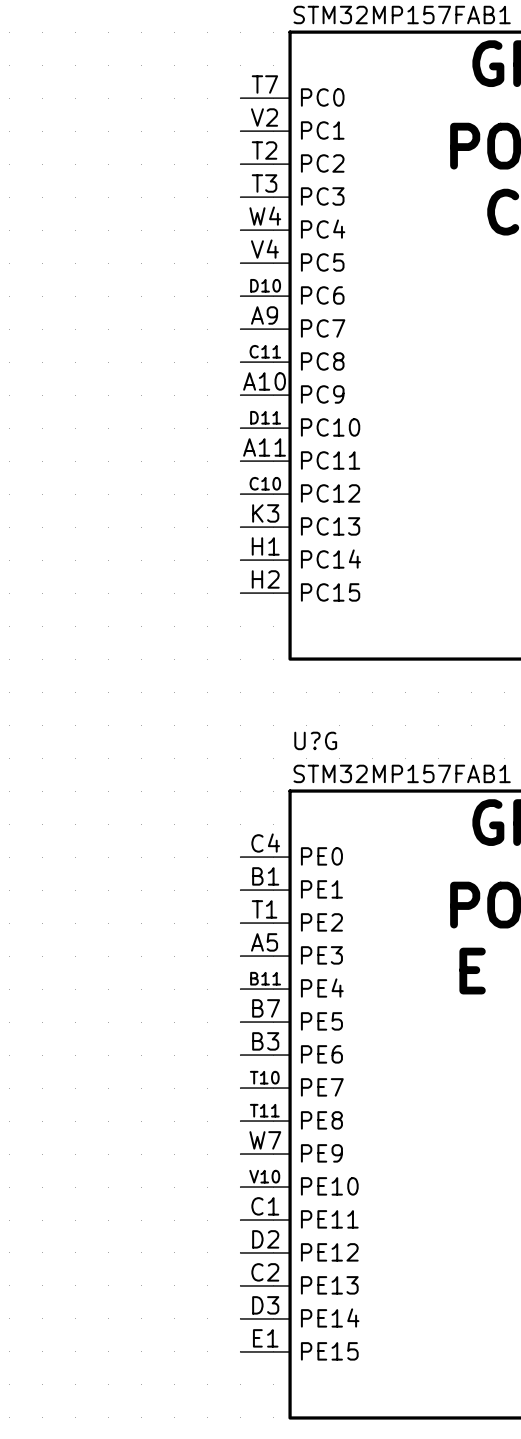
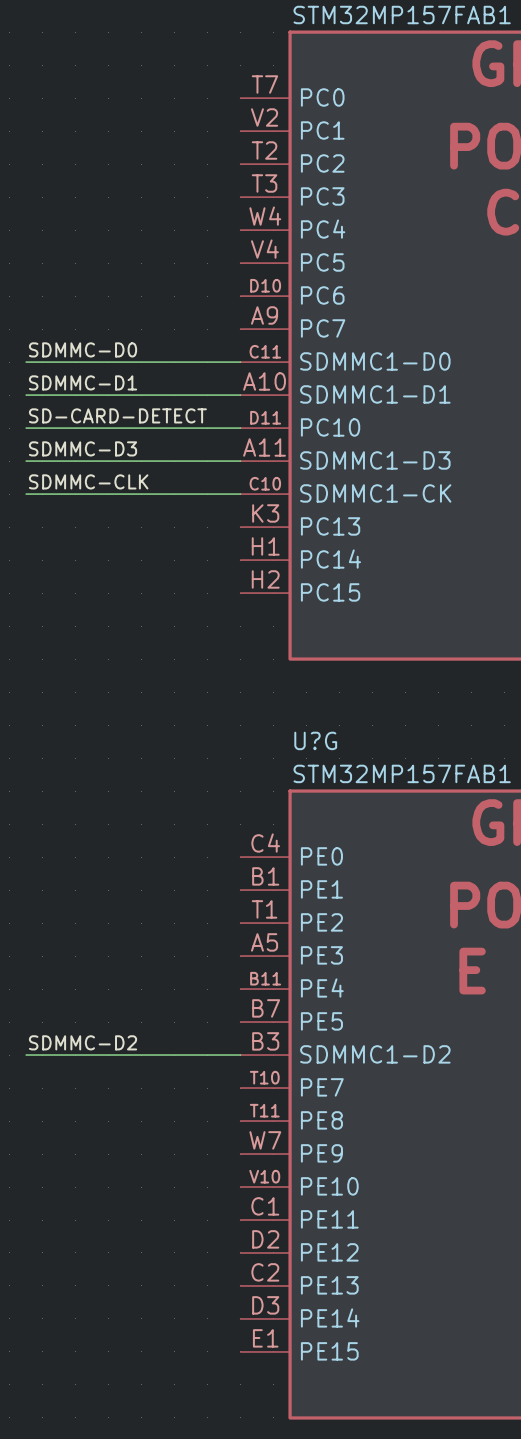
label: none -> SDMMC-D0 (83, 349)
part pin name: PC8 (322, 361) -> SDMMC1-D0 (375, 361)
wire: none -> (26, 362) (240, 362)
label: none -> SDMMC-D1 (83, 382)
part pin name: PC9 (322, 394) -> SDMMC1-D1 (375, 394)
wire: none -> (26, 395) (240, 395)
label: none -> SD-CARD-DETECT (117, 415)
wire: none -> (26, 428) (240, 428)
label: none -> SDMMC-D3 (83, 448)
part pin name: PC11 (330, 460) -> SDMMC1-D3 (375, 460)
wire: none -> (26, 461) (240, 461)
label: none -> SDMMC-CLK (88, 481)
part pin name: PC12 (330, 493) -> SDMMC1-CK (375, 493)
wire: none -> (26, 494) (240, 494)
label: none -> SDMMC-D2 (83, 1042)
U?G pin name: PE6 (321, 1054) -> SDMMC1-D2 (375, 1054)
wire: none -> (26, 1055) (240, 1055)

